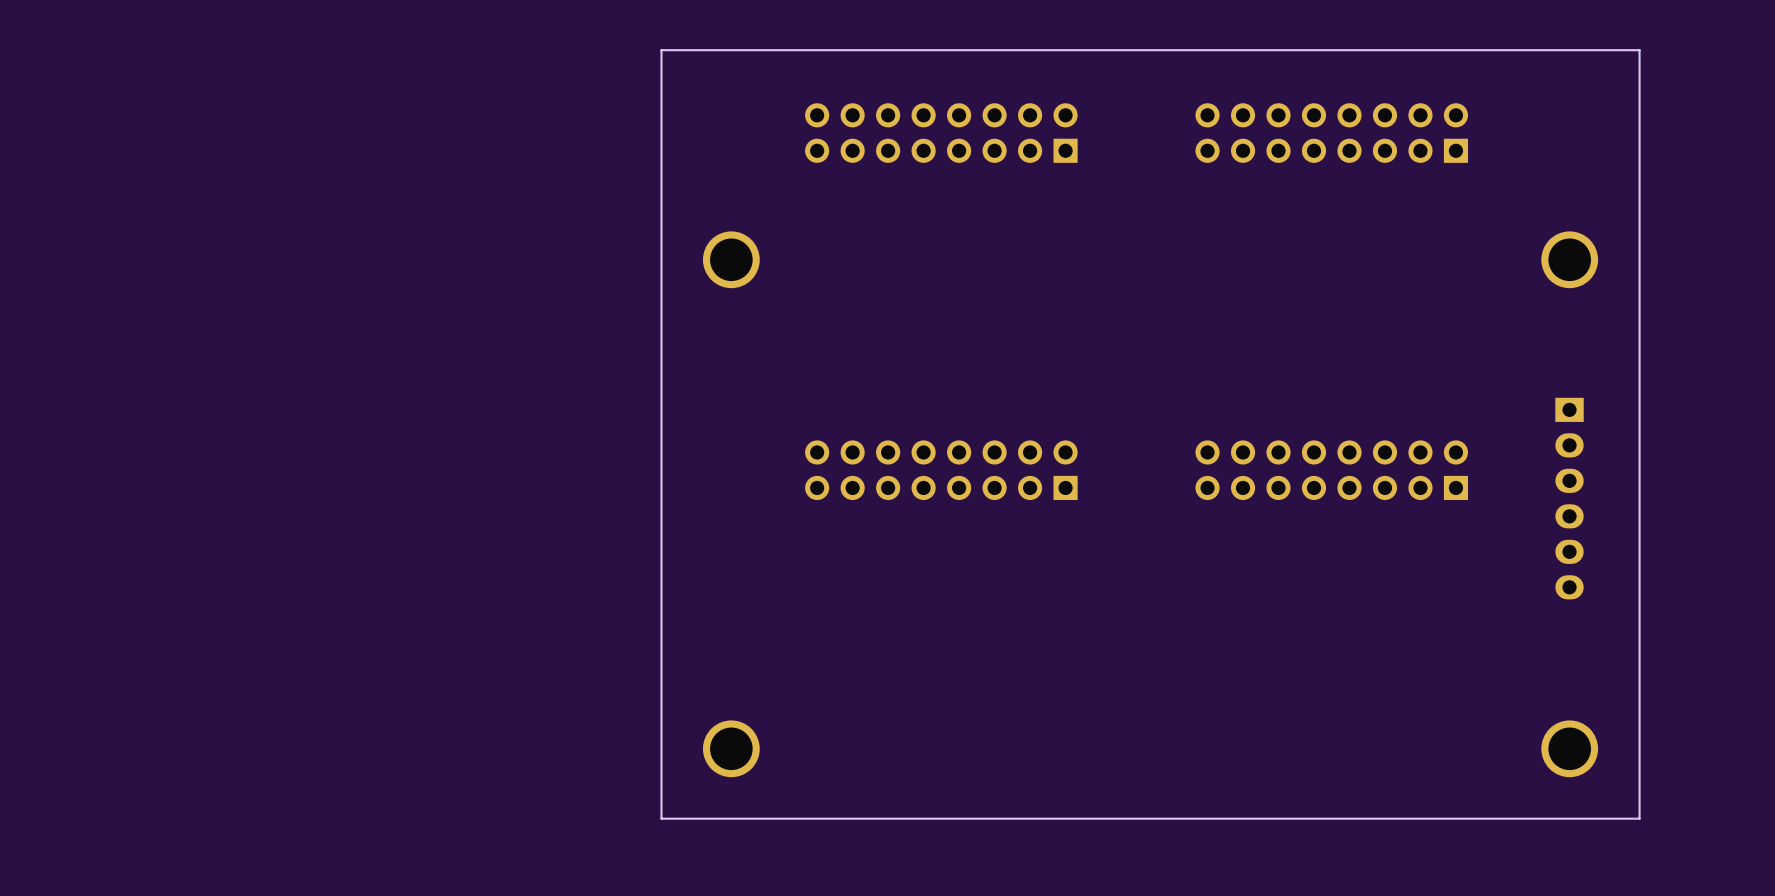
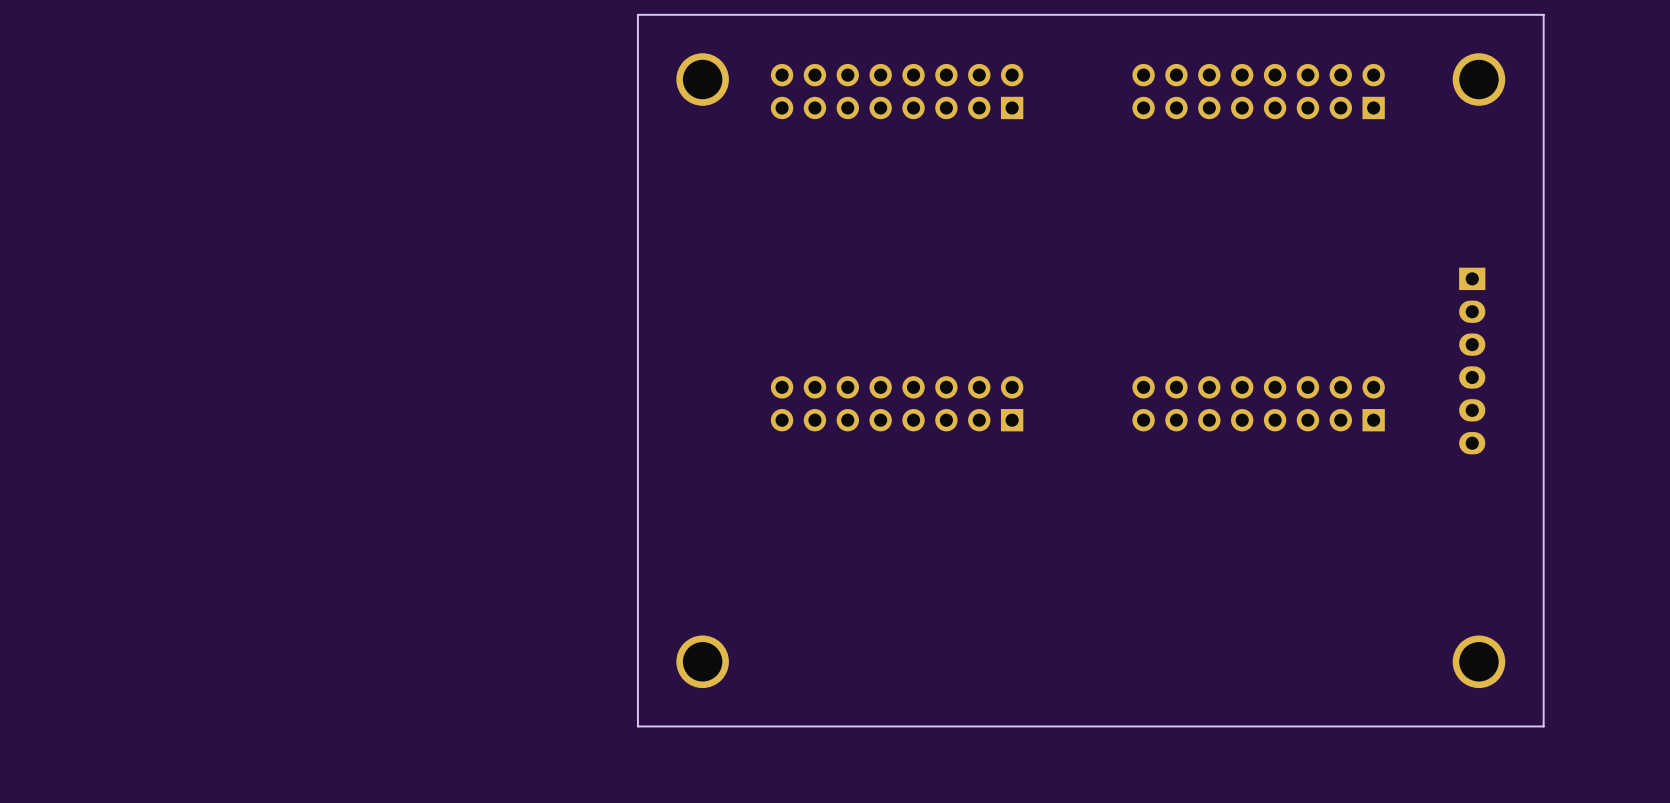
part position: (731, 259) -> (702, 79)
part position: (1569, 259) -> (1478, 79)
part position: (1569, 498) -> (1472, 361)

